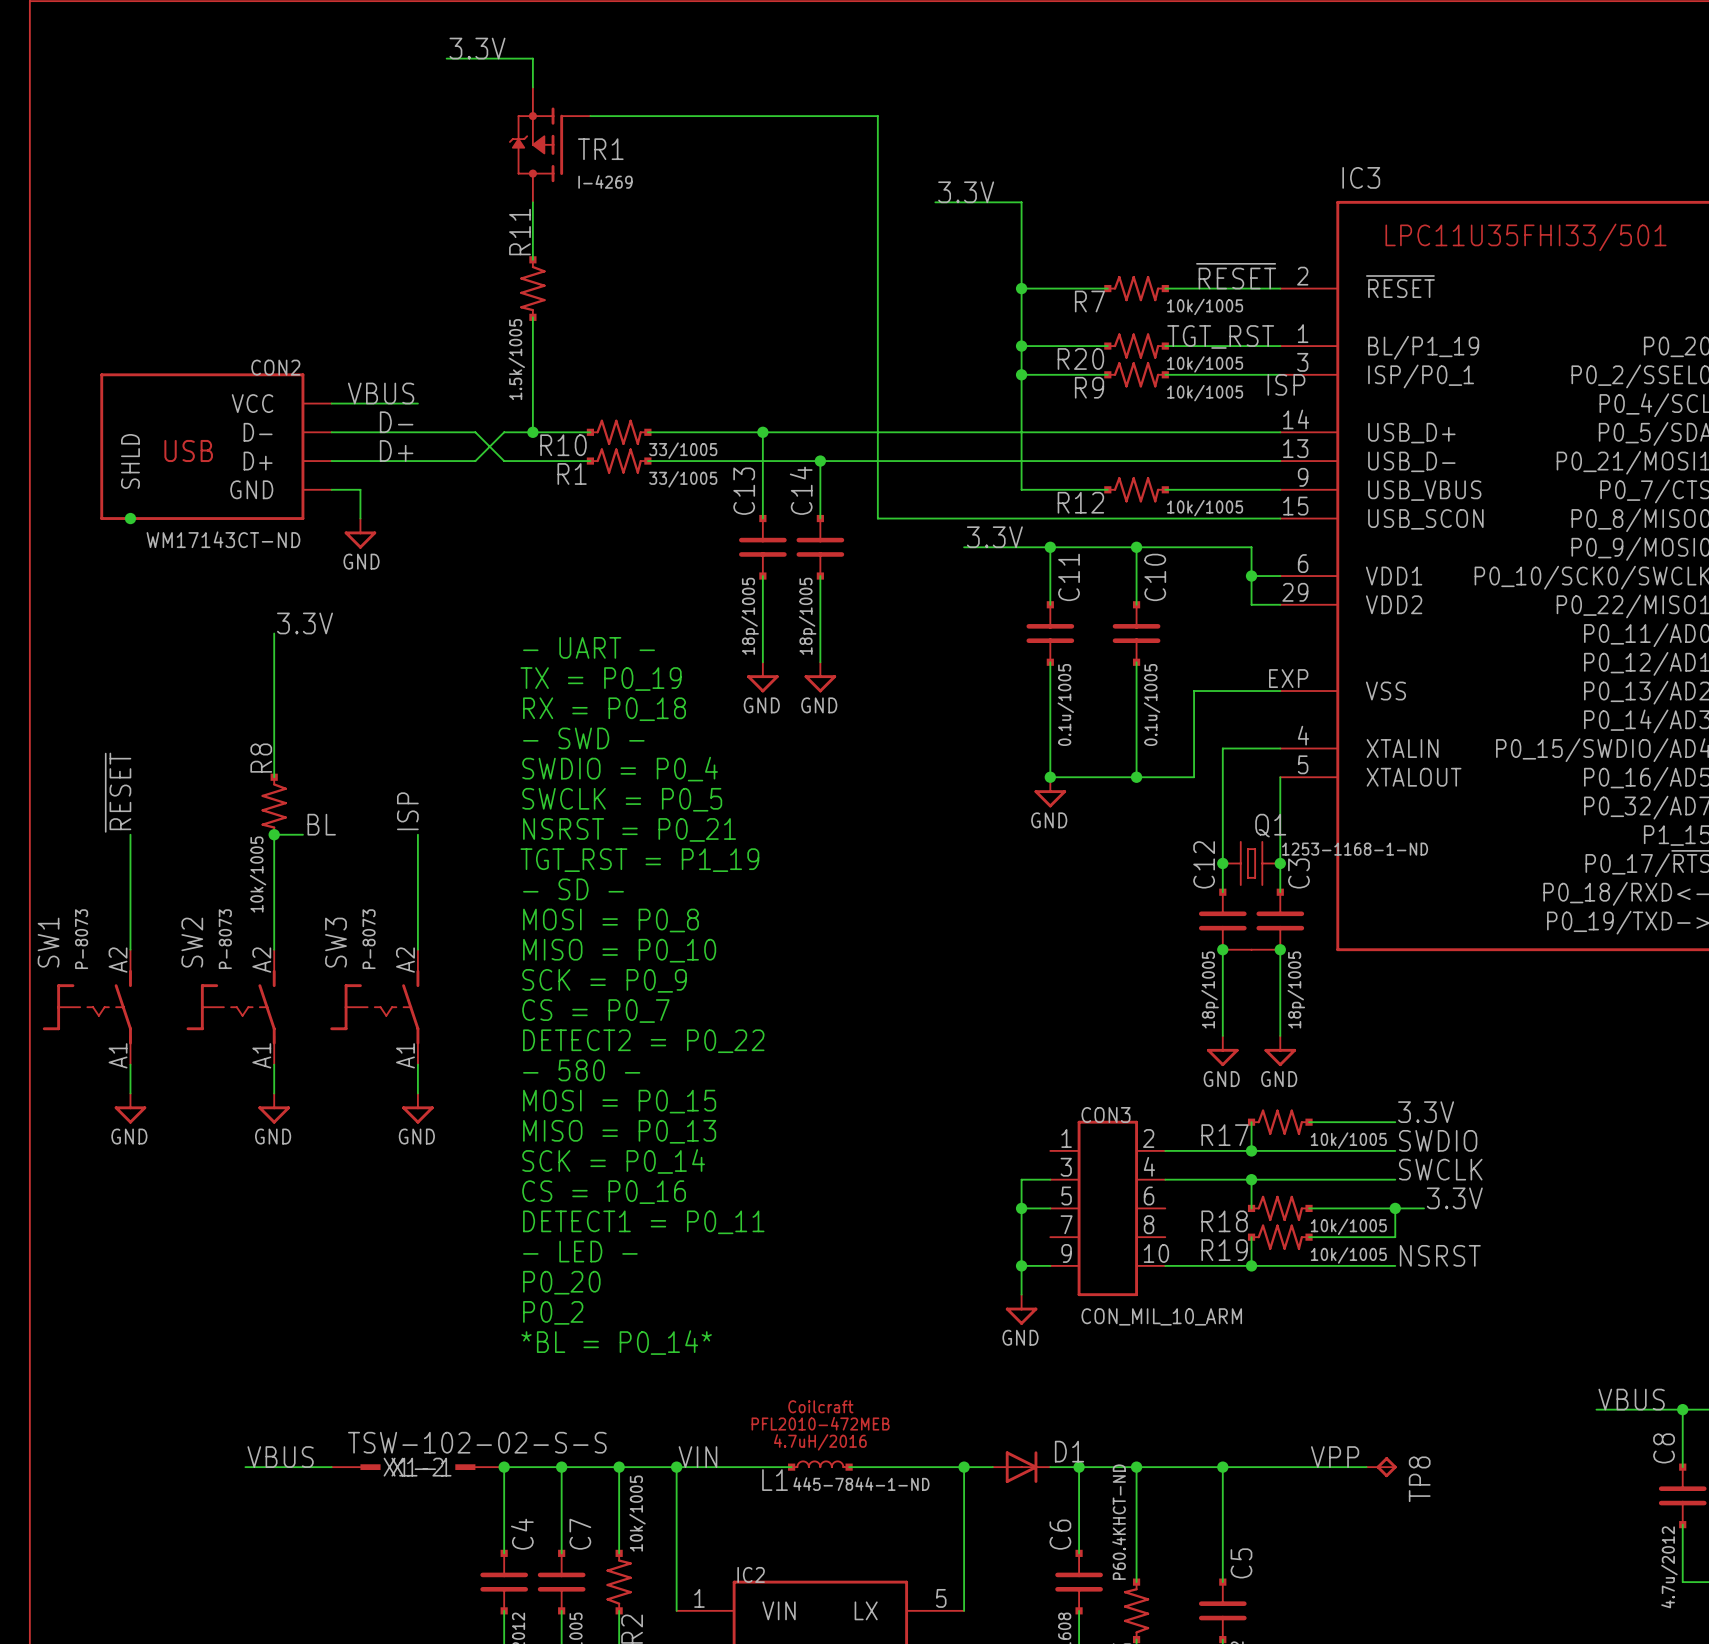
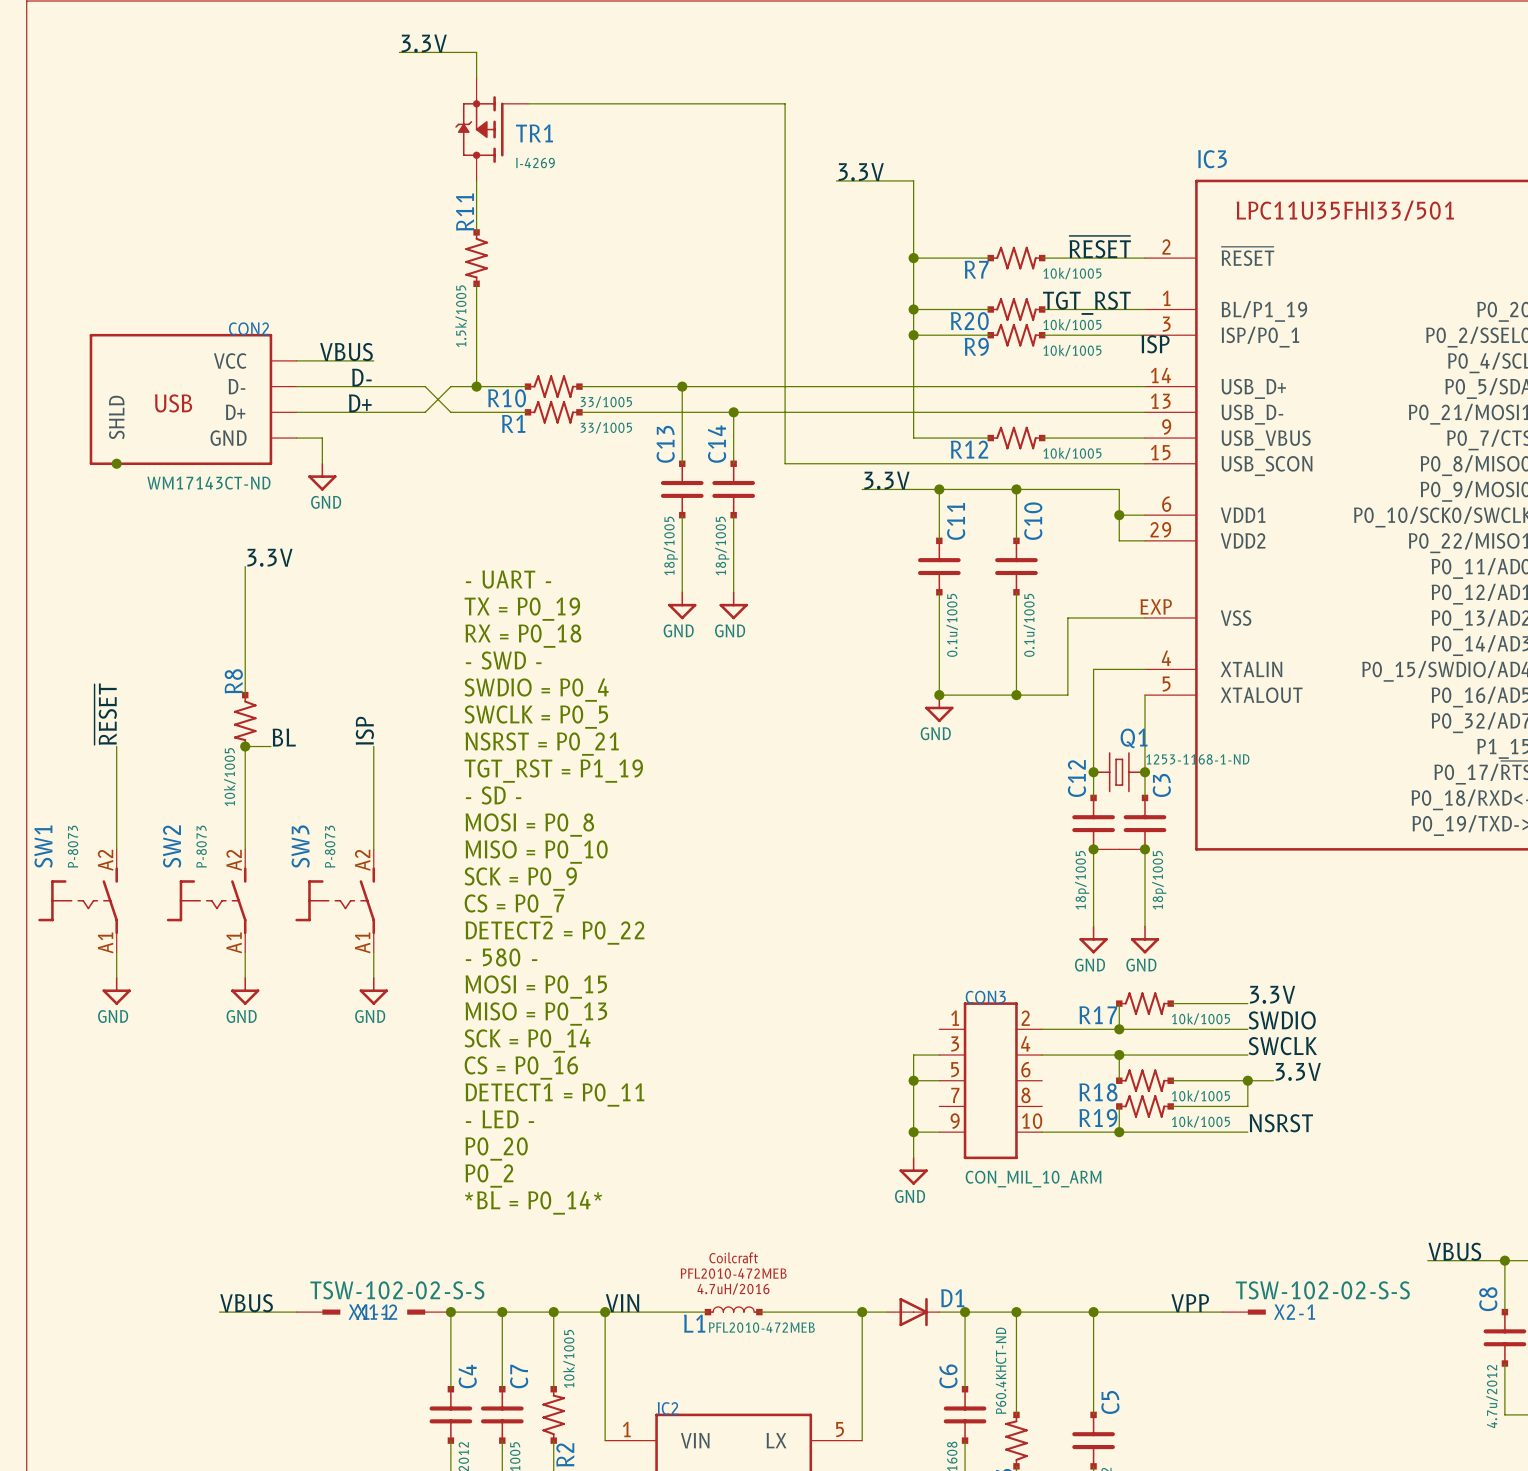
TP8: (1381, 1467) -> none
X2-1: none -> TSW-102-02-S-S (1243, 1312)
L1 value: 445-7844-1-ND (861, 1484) -> PFL2010-472MEB (761, 1327)

